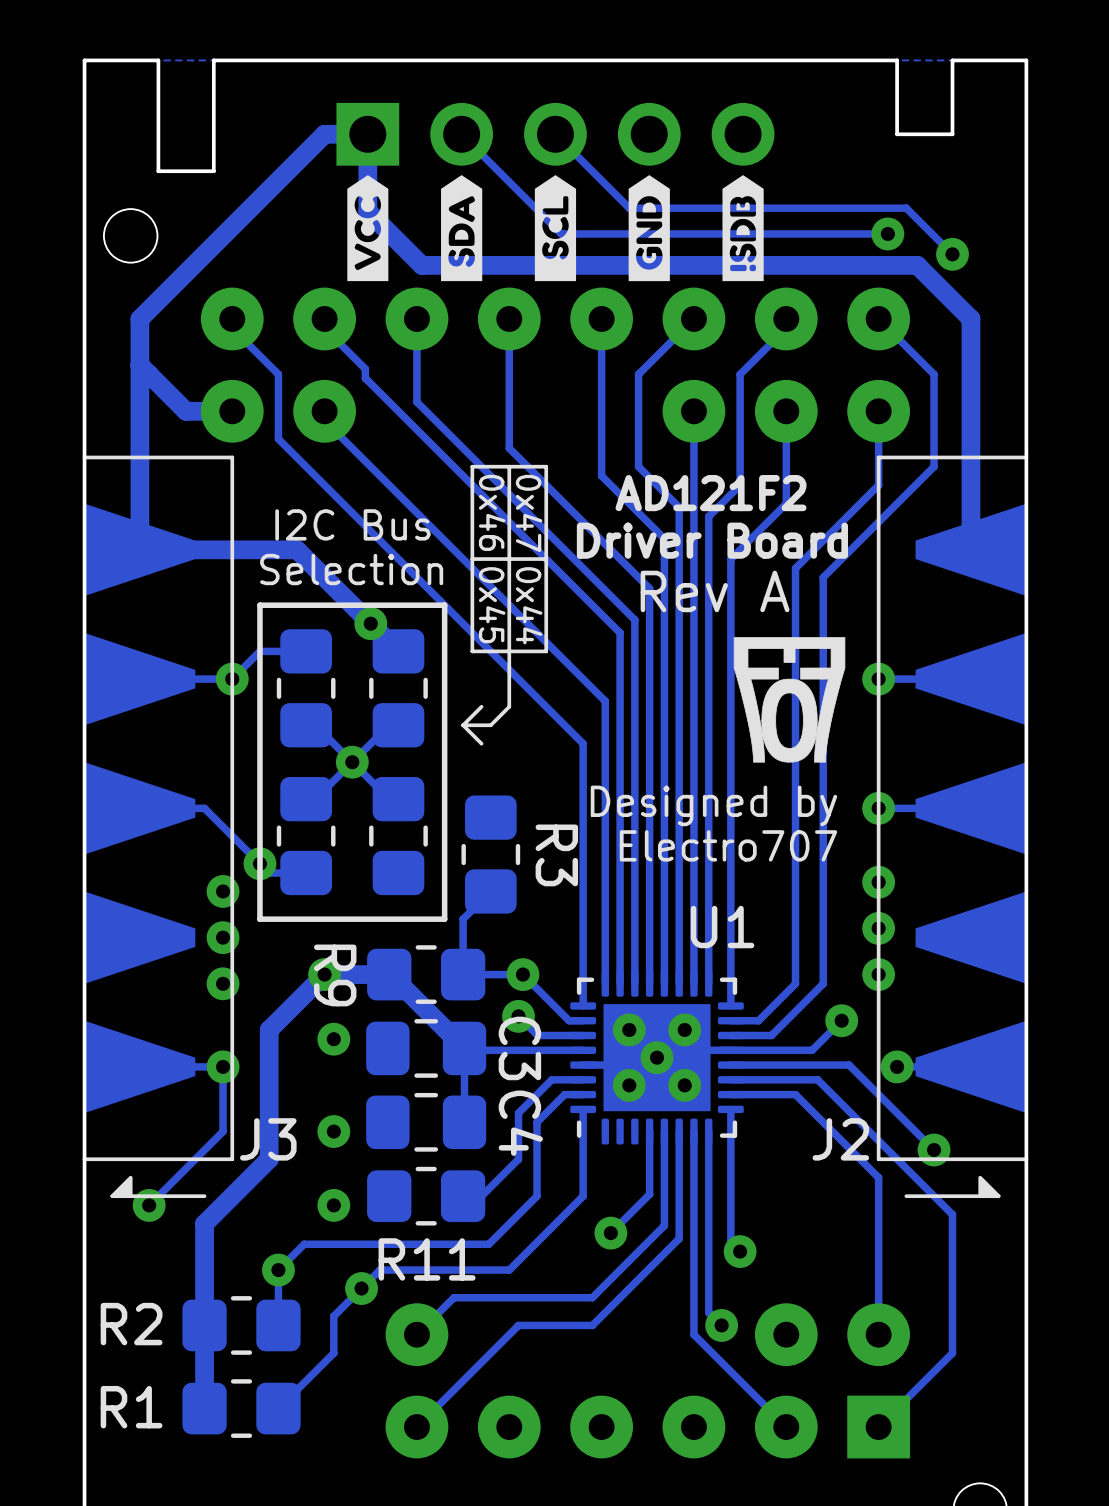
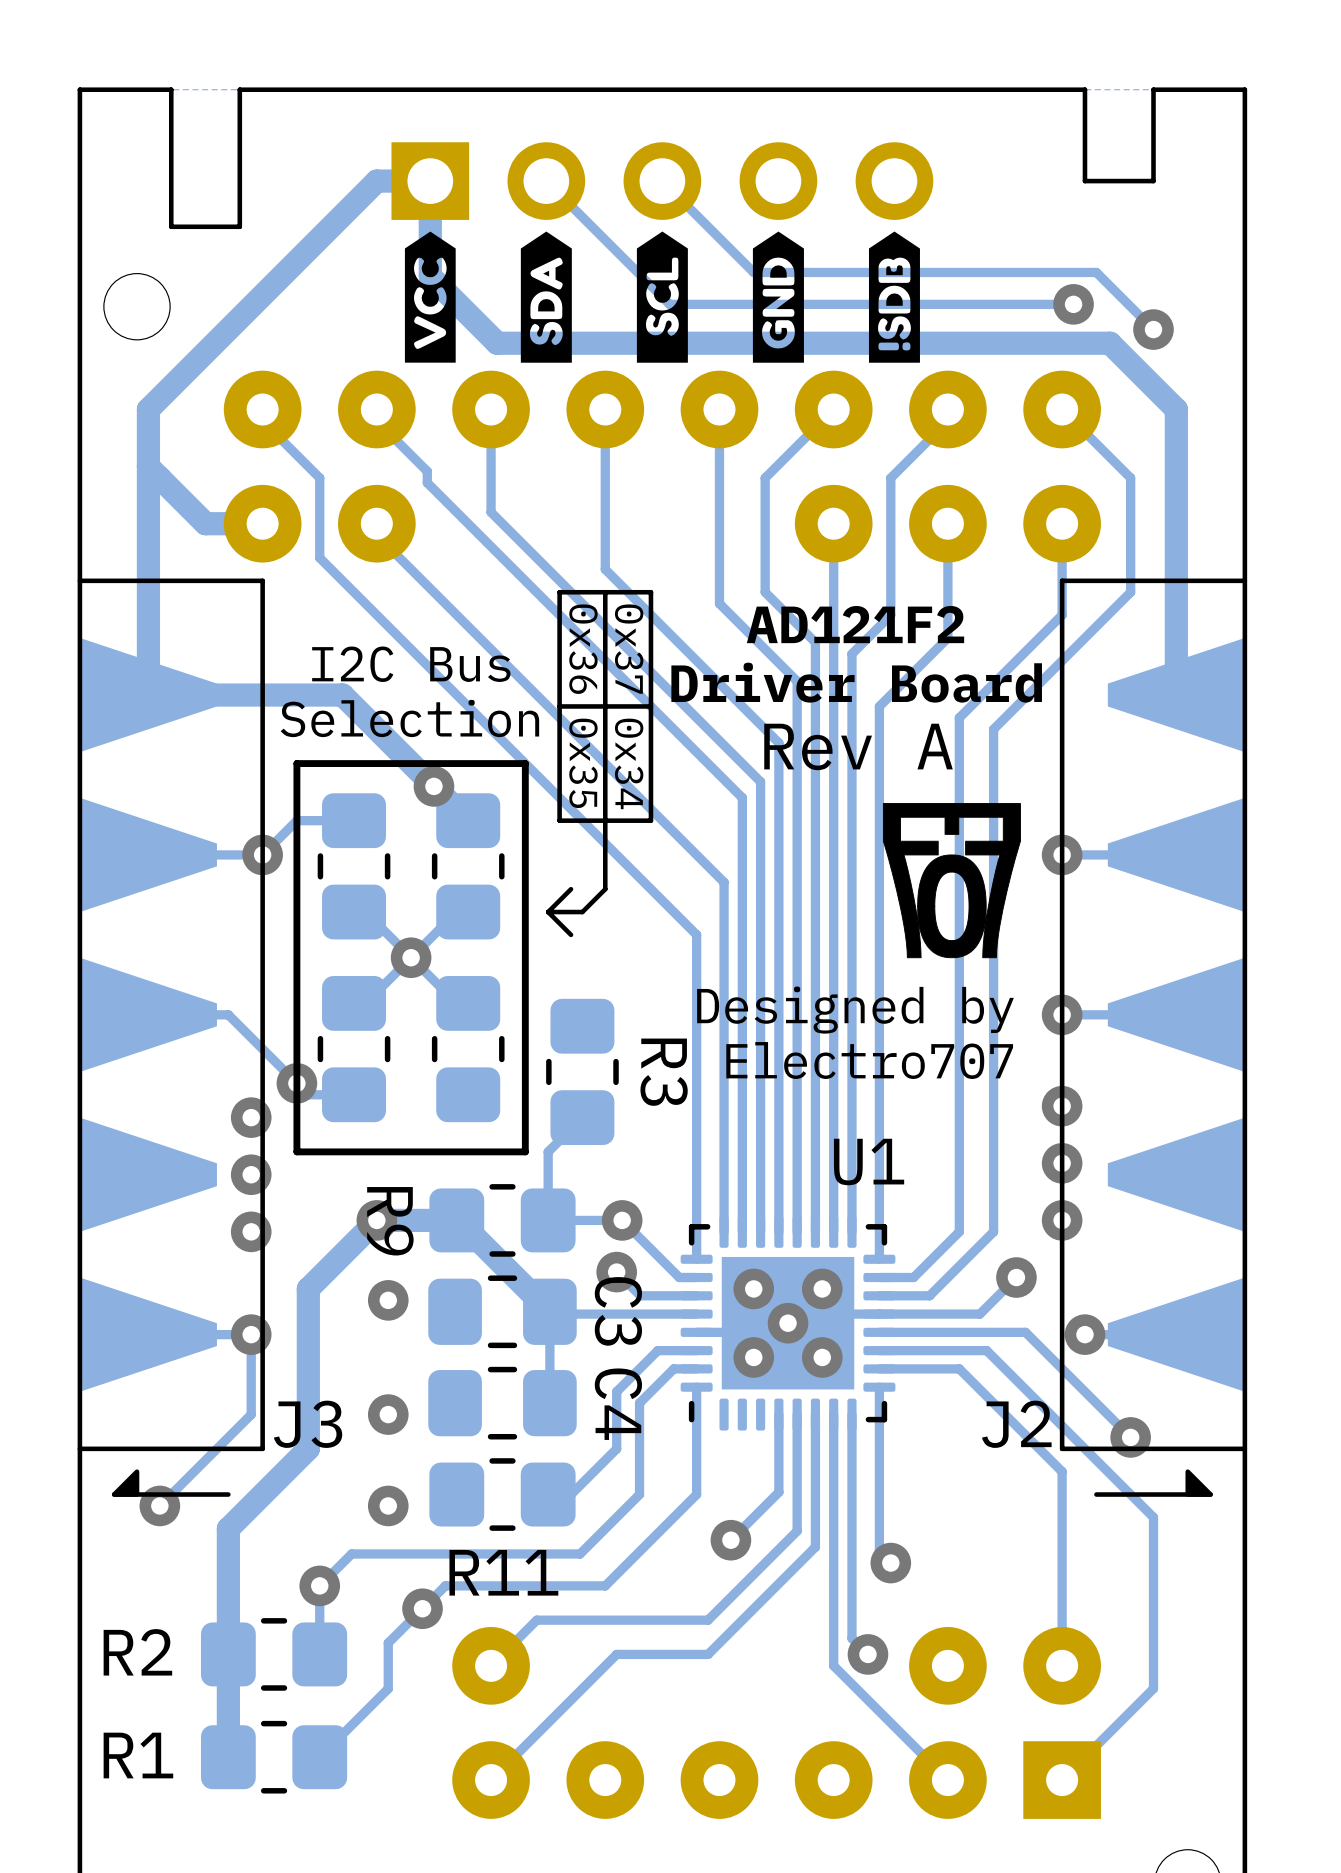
text: 0x46 (492, 512) -> 0x36 (583, 649)
text: 0x47 (529, 513) -> 0x37 (629, 649)
text: 0x45 (492, 605) -> 0x35 (583, 763)
text: 0x44 (529, 605) -> 0x34 (629, 763)

